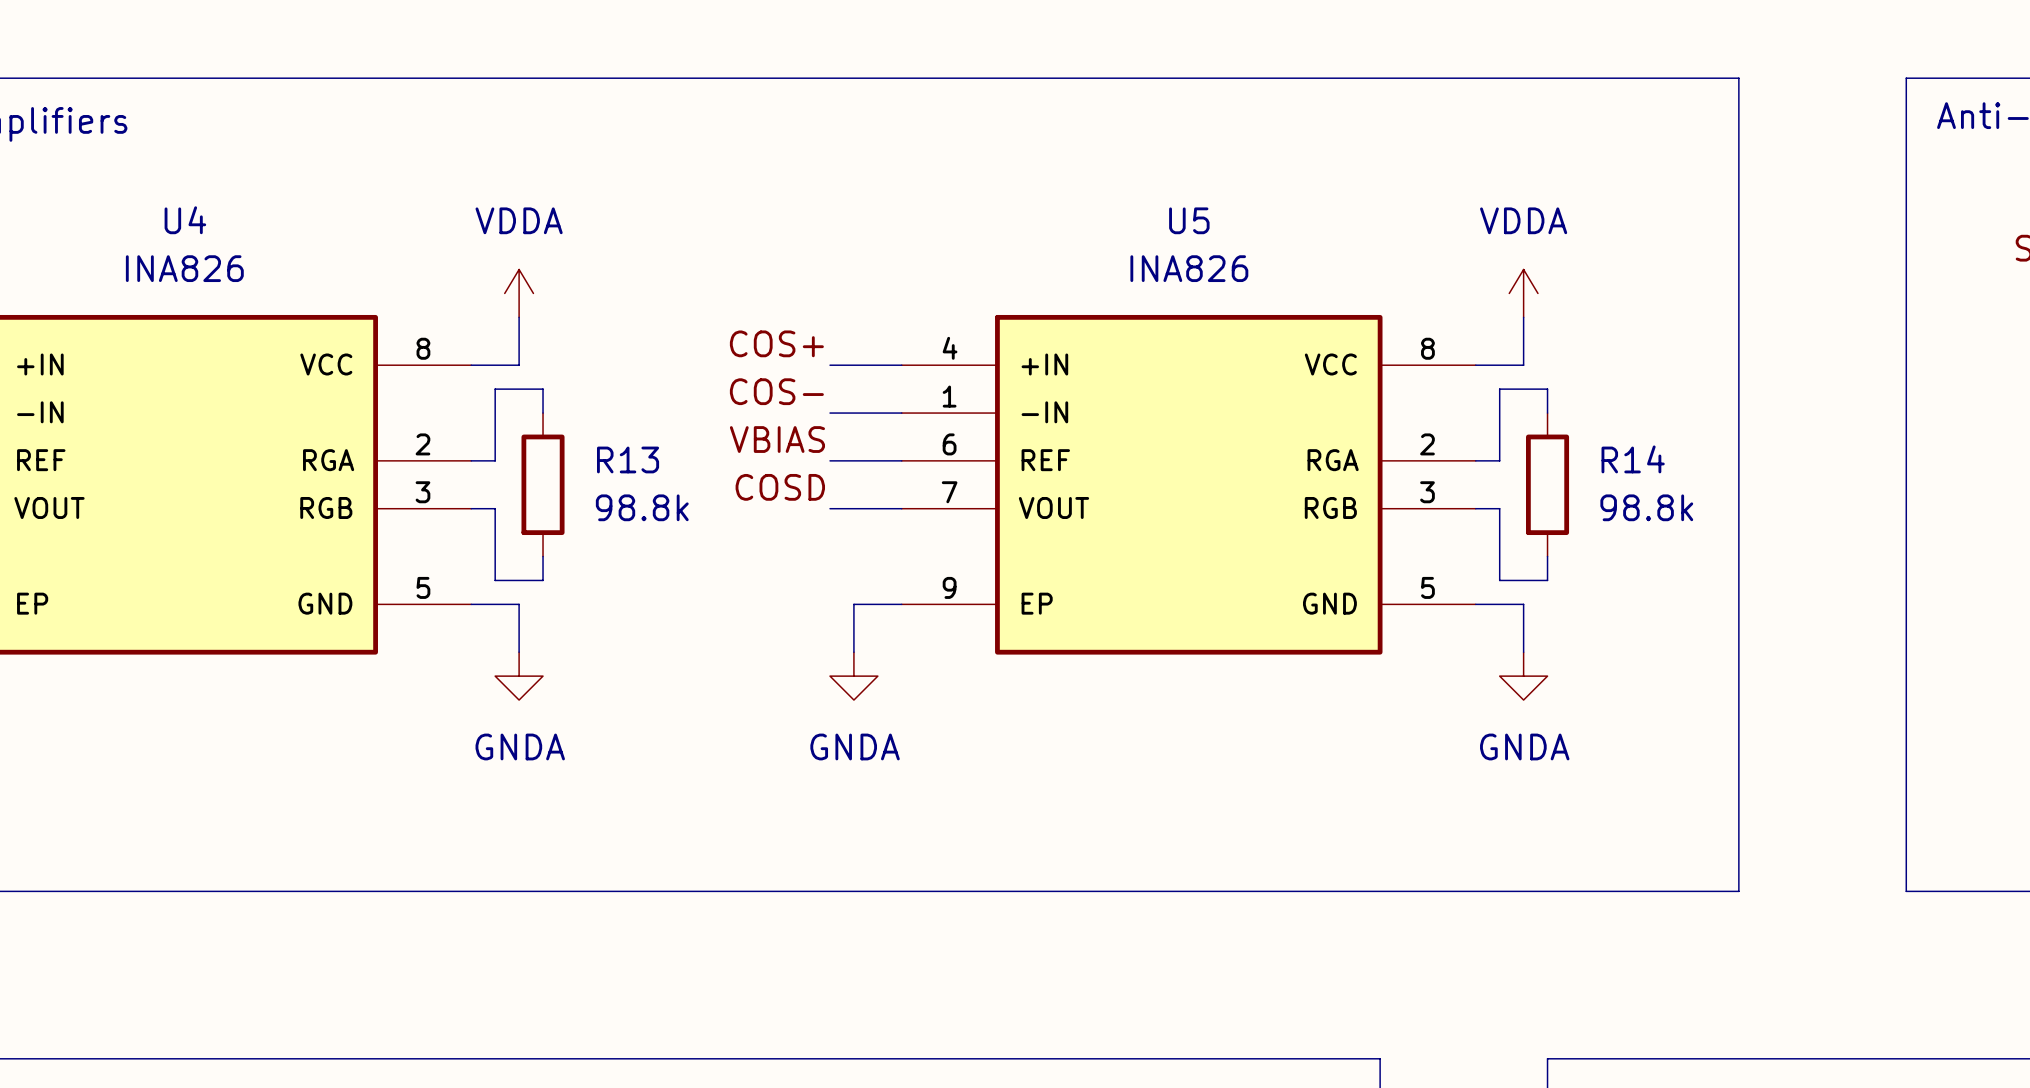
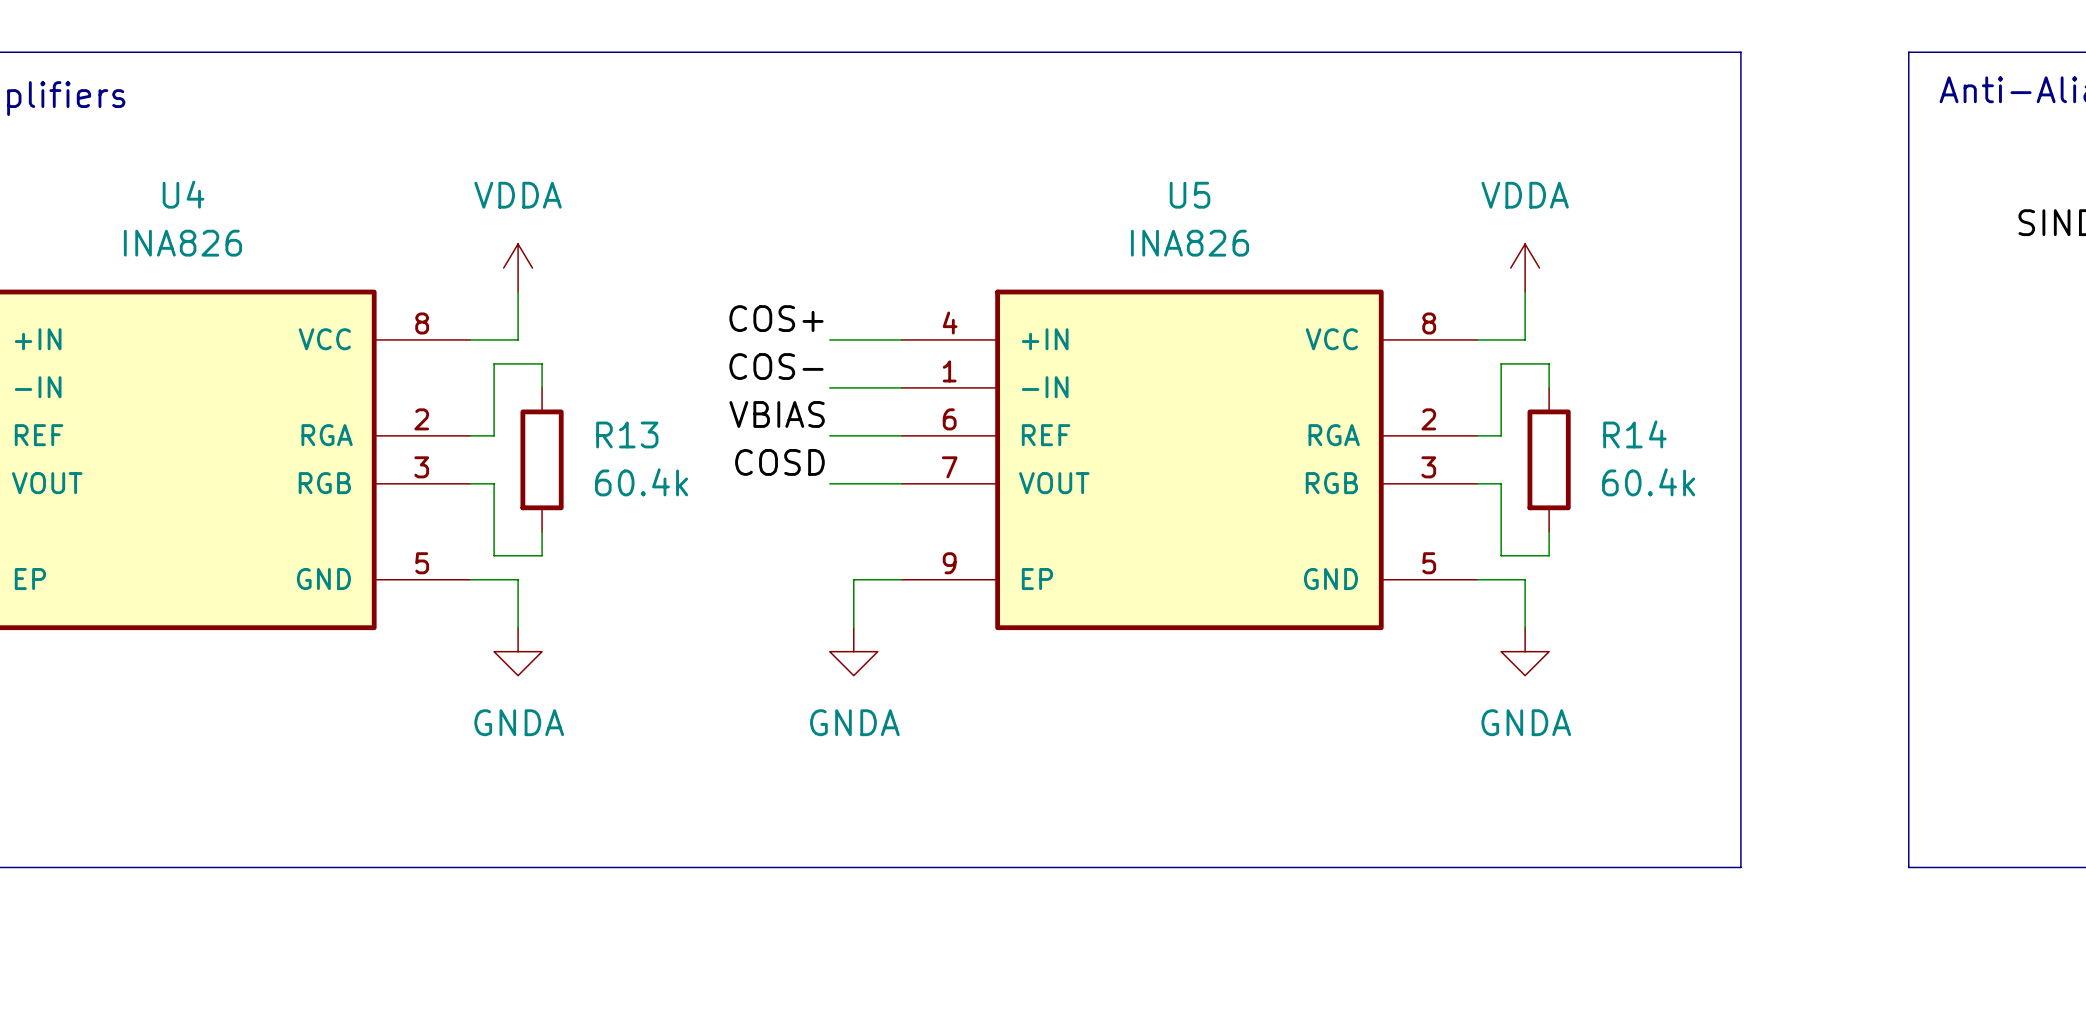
R13 value: 98.8k (642, 507) -> 60.4k (641, 482)
R14 value: 98.8k (1646, 507) -> 60.4k (1648, 482)

